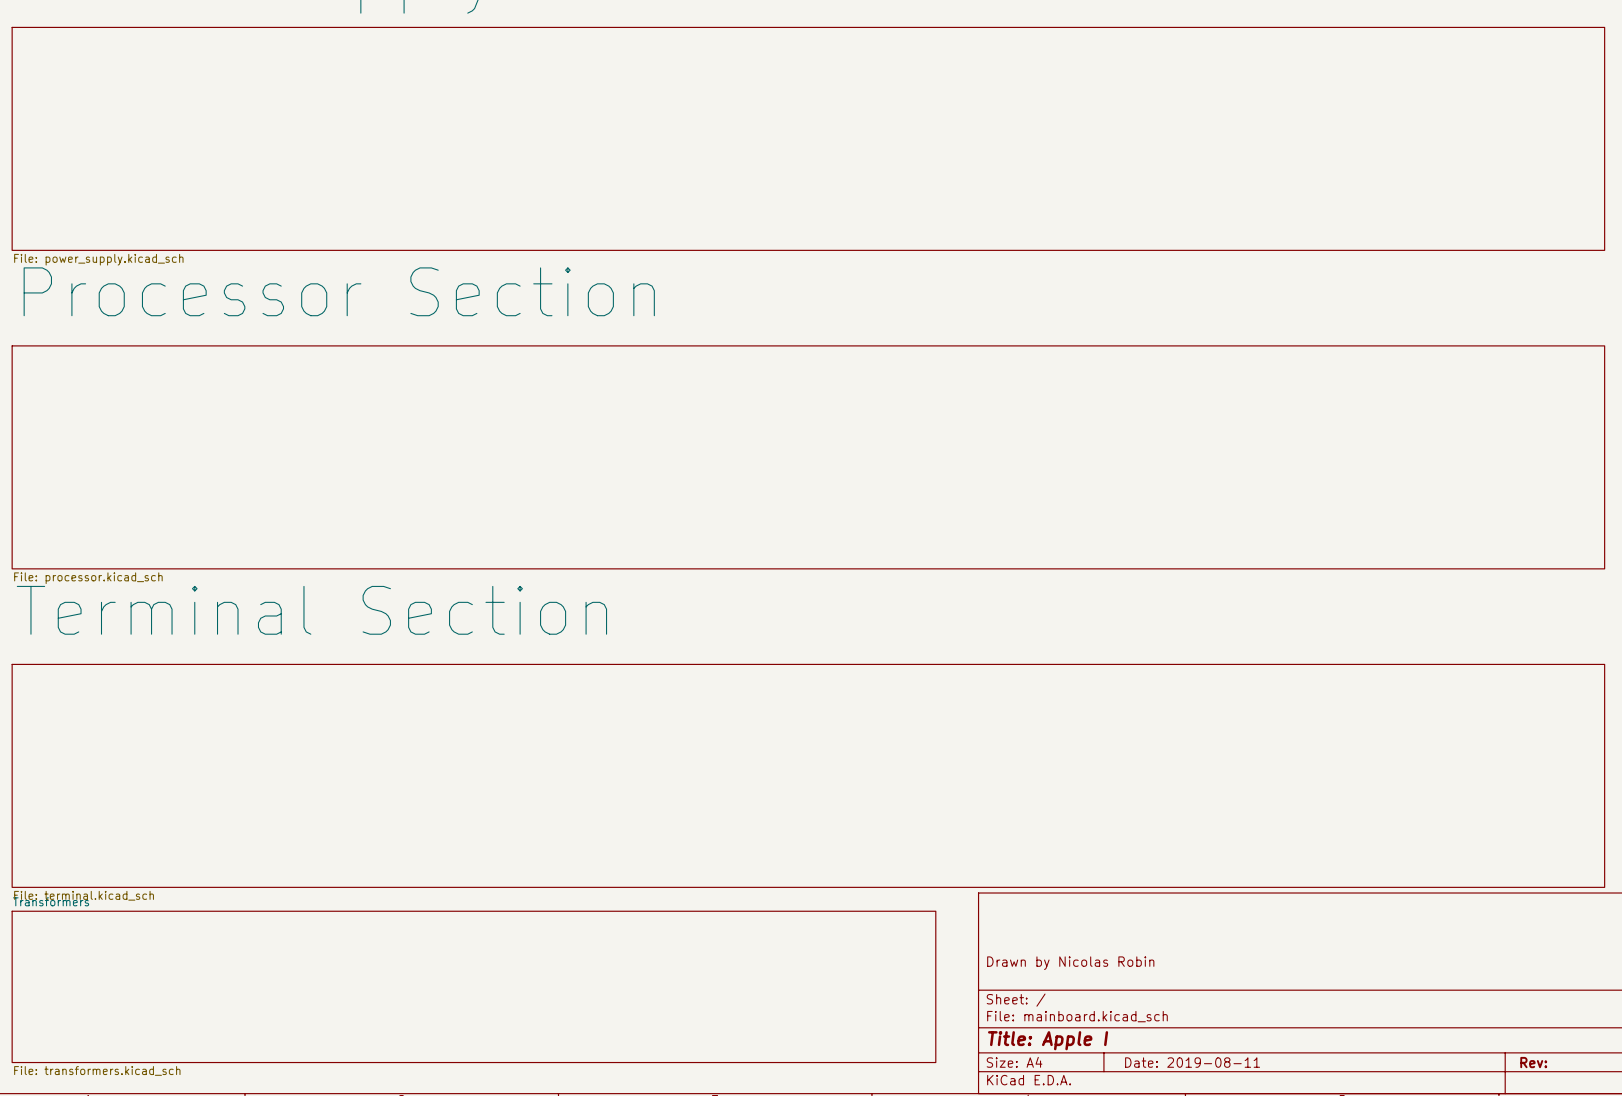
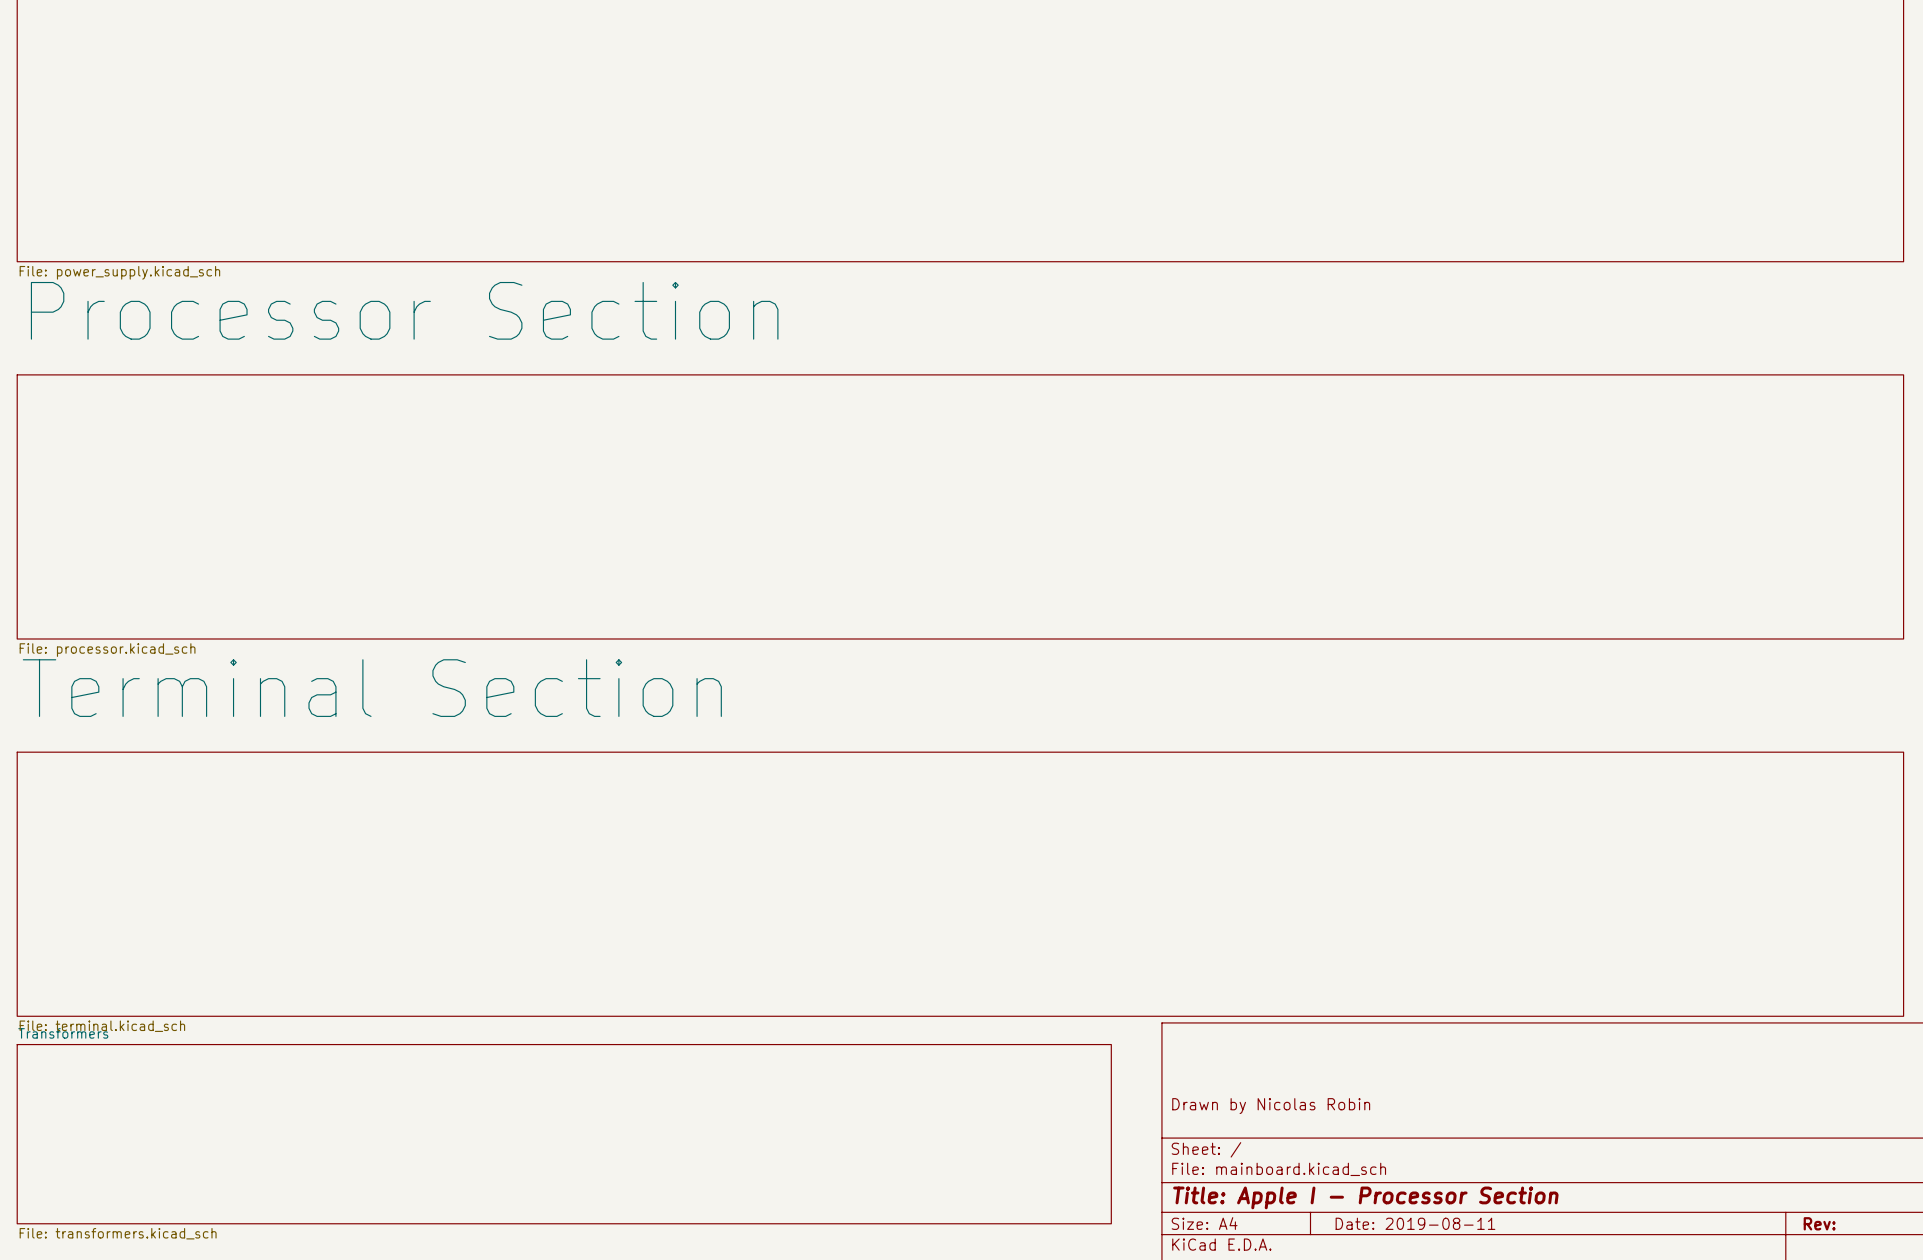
title block: Title: Apple I (1048, 1040) -> Title: Apple I - Processor Section (1365, 1197)

